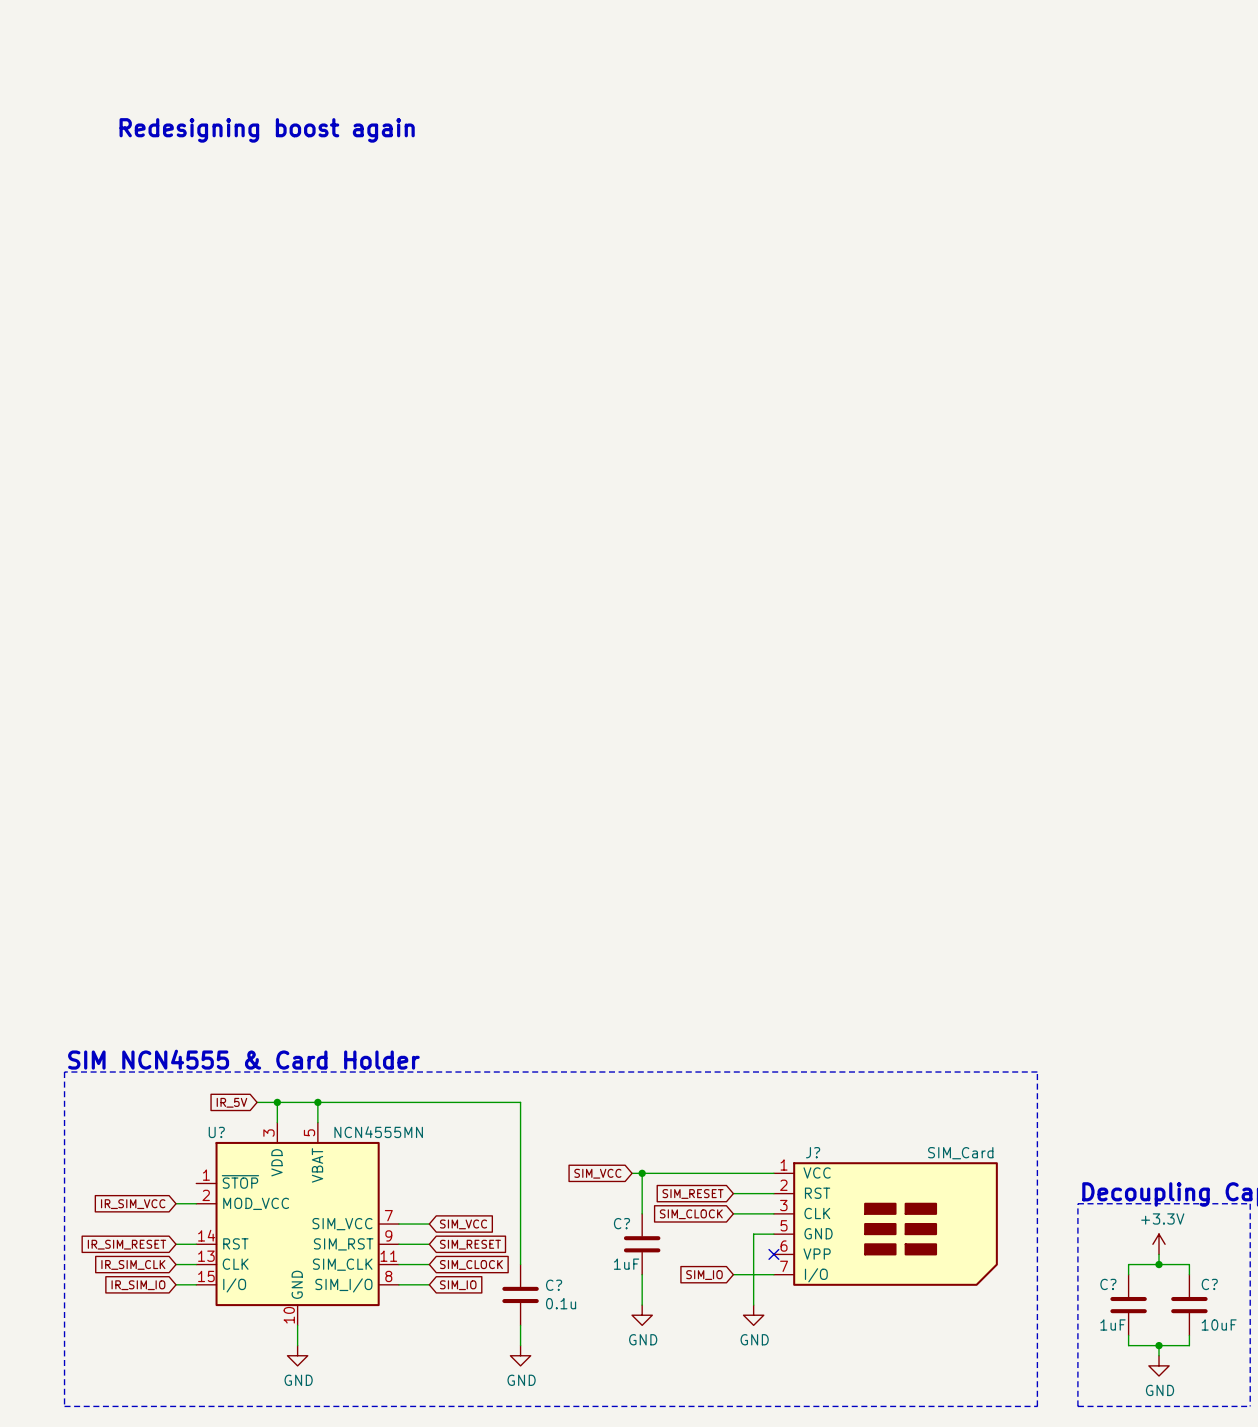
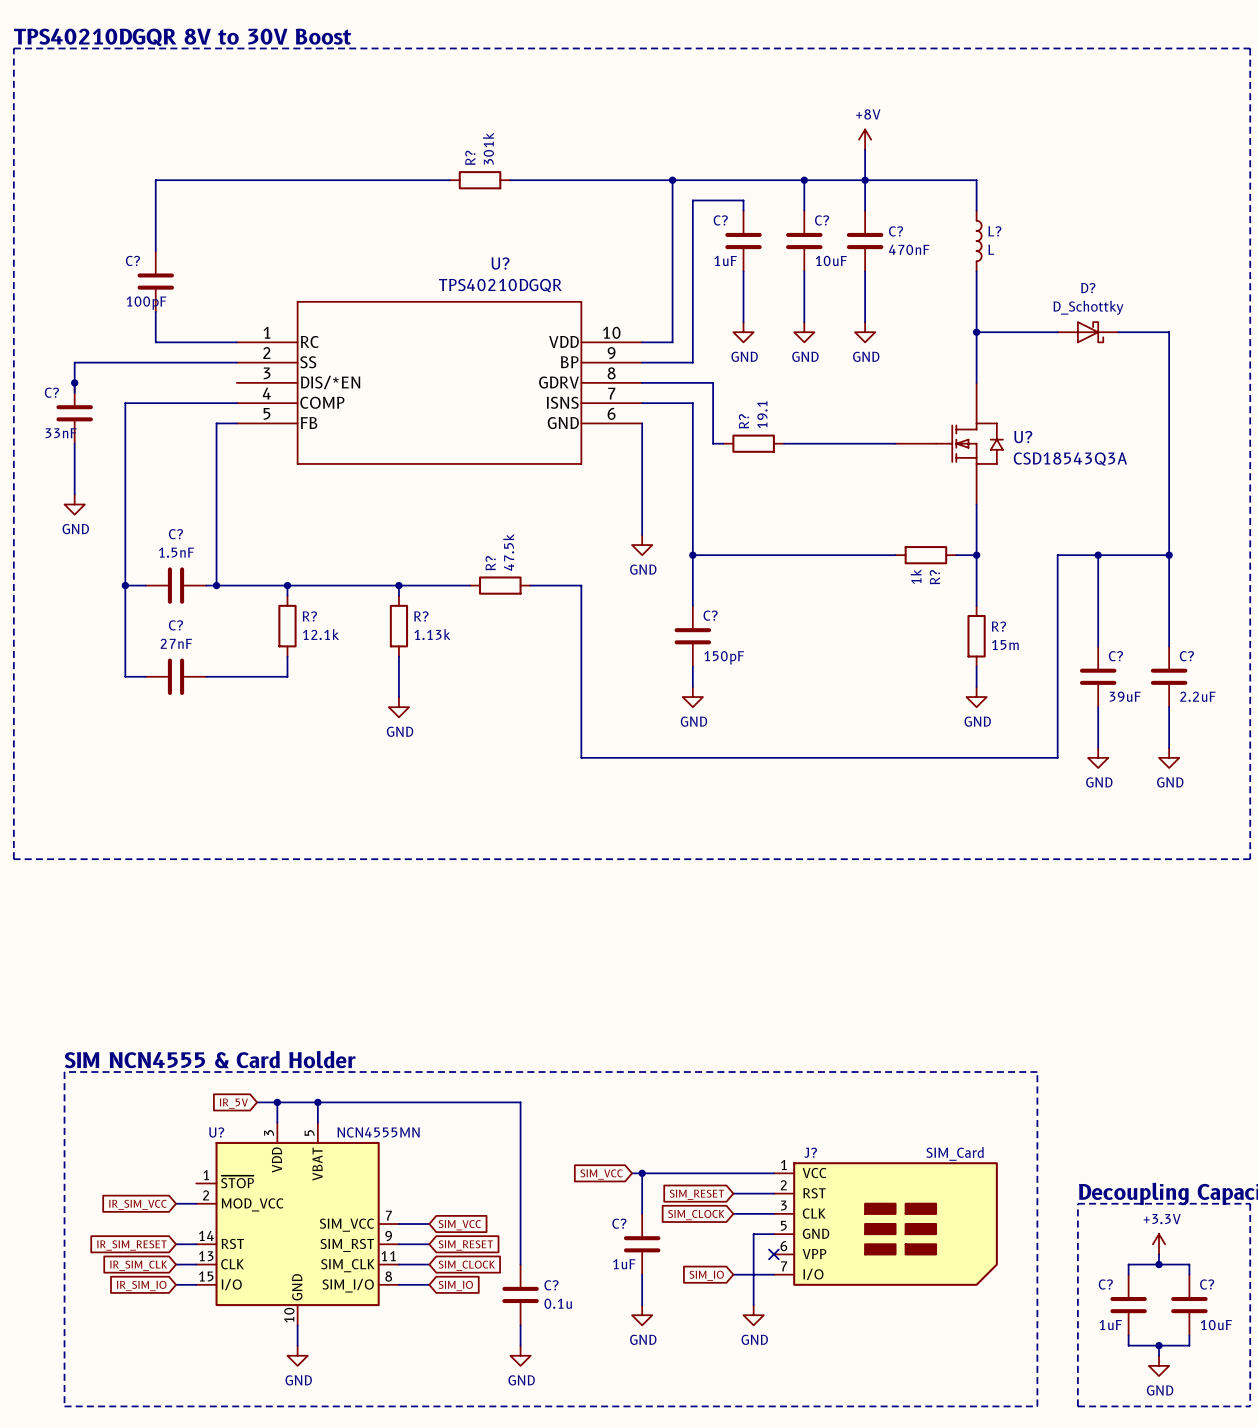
text: none -> TPS40210DGQR 8V to 30V Boost (182, 37)
line: none -> (13, 48) (13, 859) (1250, 859) (1250, 48) (13, 48)
text: Redesigning boost again (267, 130) -> none
power symbol: none -> +8V (865, 139)
wire: none -> (865, 149) (865, 210)
wire: none -> (449, 180) (155, 180) (155, 251)
R?: none -> 301k (480, 180)
wire: none -> (510, 180) (976, 180) (976, 210)
wire: none -> (672, 180) (672, 342) (642, 342)
junction: none -> (672, 180)
wire: none -> (804, 180) (804, 210)
junction: none -> (804, 180)
junction: none -> (865, 180)
wire: none -> (743, 210) (743, 200) (692, 200) (692, 362) (642, 362)
C?: none -> 1uF (743, 241)
C?: none -> 10uF (804, 241)
C?: none -> 470nF (865, 241)
L?: none -> L (979, 241)
wire: none -> (743, 271) (743, 322)
wire: none -> (804, 271) (804, 322)
wire: none -> (865, 271) (865, 322)
wire: none -> (976, 271) (976, 382)
C?: none -> 100pF (155, 281)
wire: none -> (155, 311) (155, 342) (236, 342)
power symbol: none -> GND (743, 332)
power symbol: none -> GND (804, 332)
power symbol: none -> GND (865, 332)
wire: none -> (976, 332) (1057, 332)
junction: none -> (976, 332)
D?: none -> D_Schottky (1088, 332)
wire: none -> (1118, 332) (1169, 332) (1169, 646)
wire: none -> (236, 362) (74, 362) (74, 393)
junction: none -> (74, 382)
U?: none -> TPS40210DGQR (439, 382)
wire: none -> (642, 382) (713, 382) (713, 443) (723, 443)
wire: none -> (236, 403) (125, 403) (125, 676) (145, 676)
wire: none -> (642, 403) (692, 403) (692, 605)
C?: none -> 33nF (74, 413)
wire: none -> (236, 423) (216, 423) (216, 585)
wire: none -> (642, 423) (642, 534)
wire: none -> (74, 443) (74, 494)
R?: none -> 19.1 (753, 443)
wire: none -> (784, 443) (895, 443)
U?: none -> CSD18543Q3A (949, 443)
power symbol: none -> GND (74, 504)
wire: none -> (976, 504) (976, 605)
power symbol: none -> GND (642, 545)
wire: none -> (692, 555) (895, 555)
junction: none -> (692, 555)
R?: none -> 1k (925, 555)
wire: none -> (956, 555) (976, 555)
junction: none -> (976, 555)
wire: none -> (1098, 555) (1098, 646)
junction: none -> (1098, 555)
wire: none -> (1169, 555) (1057, 555) (1057, 757) (581, 757) (581, 585) (530, 585)
junction: none -> (1169, 555)
wire: none -> (125, 585) (145, 585)
junction: none -> (125, 585)
C?: none -> 1.5nF (176, 585)
wire: none -> (206, 585) (469, 585)
junction: none -> (216, 585)
wire: none -> (287, 585) (287, 595)
junction: none -> (287, 585)
wire: none -> (398, 585) (398, 595)
junction: none -> (398, 585)
R?: none -> 47.5k (500, 585)
R?: none -> 12.1k (287, 626)
R?: none -> 1.13k (398, 626)
C?: none -> 150pF (692, 636)
R?: none -> 15m (976, 636)
wire: none -> (287, 656) (287, 676) (206, 676)
wire: none -> (398, 656) (398, 697)
wire: none -> (692, 666) (692, 686)
wire: none -> (976, 666) (976, 686)
C?: none -> 27nF (176, 676)
C?: none -> 39uF (1098, 676)
C?: none -> 2.2uF (1169, 676)
power symbol: none -> GND (692, 697)
power symbol: none -> GND (976, 697)
power symbol: none -> GND (398, 707)
wire: none -> (1098, 707) (1098, 747)
wire: none -> (1169, 707) (1169, 747)
power symbol: none -> GND (1098, 757)
power symbol: none -> GND (1169, 757)

